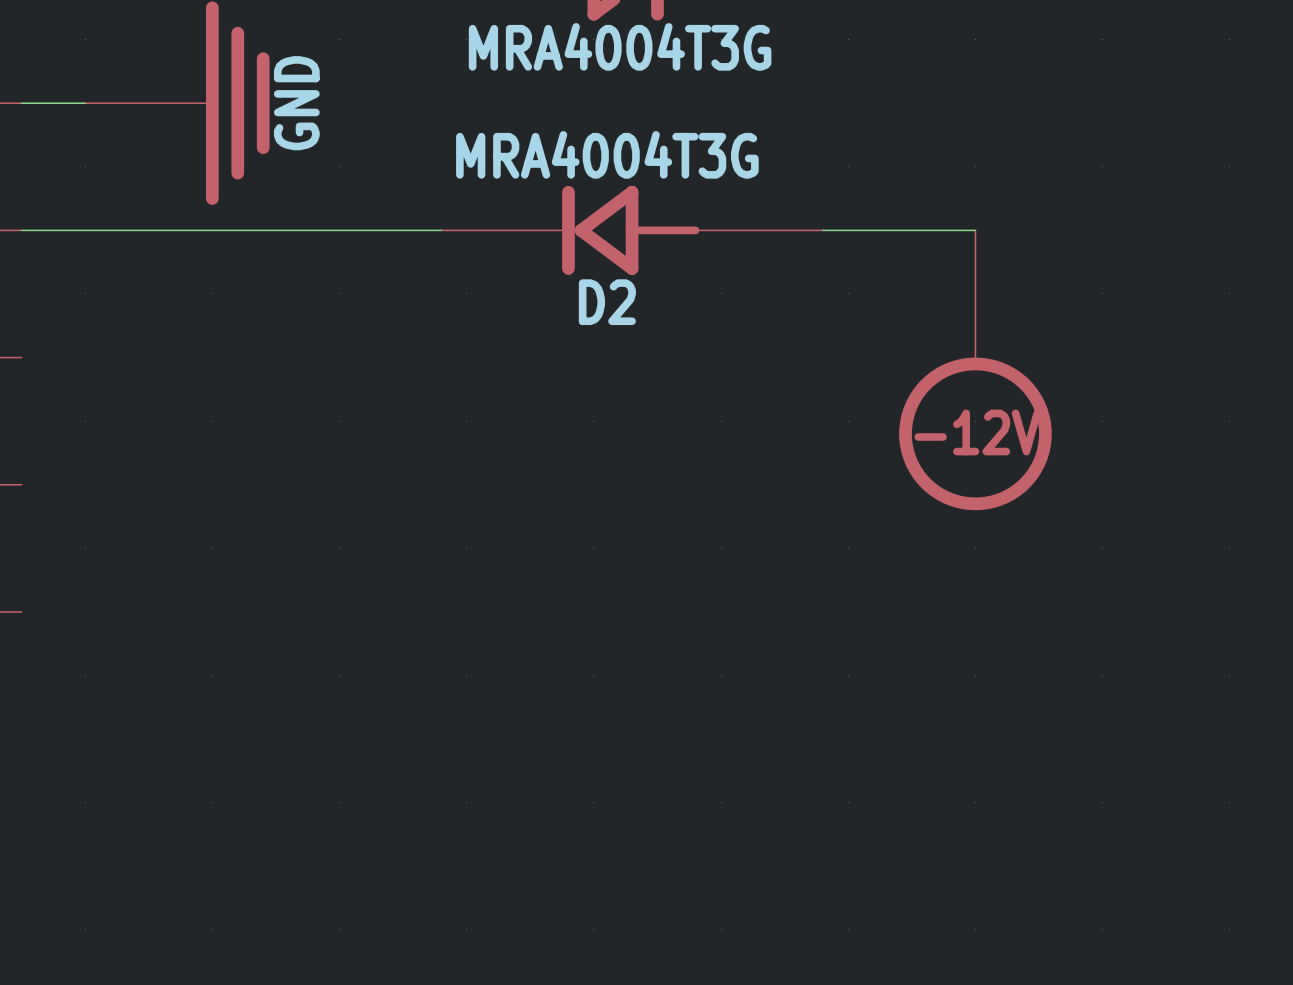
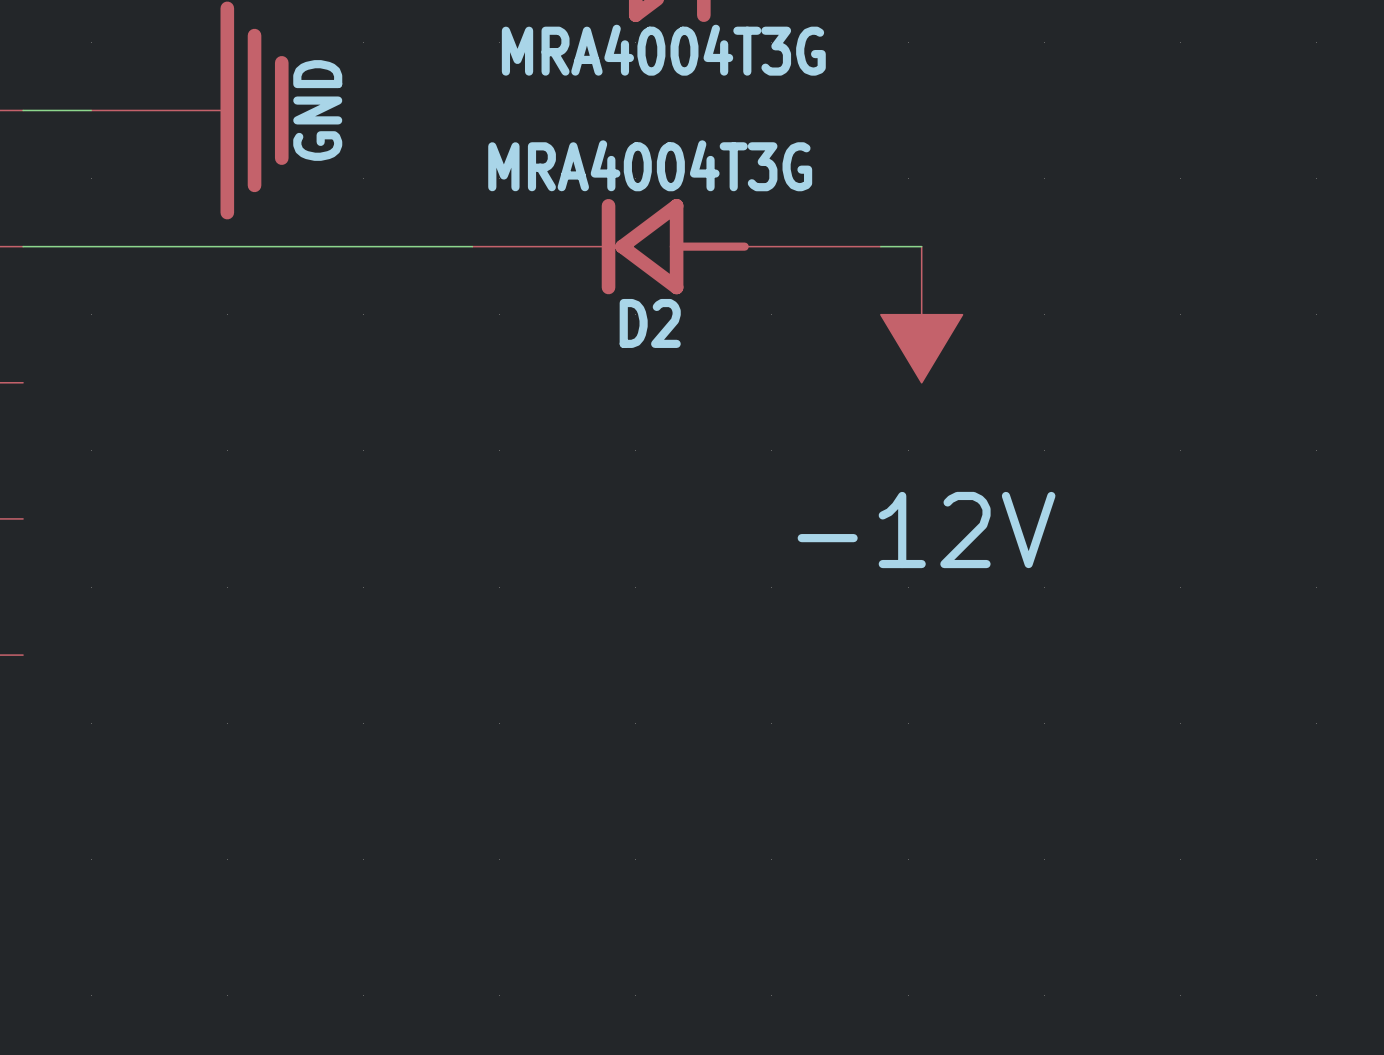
wire: (860, 230) (975, 230) -> none
power symbol: none -> -12V (921, 314)
power symbol: (975, 370) -> none

